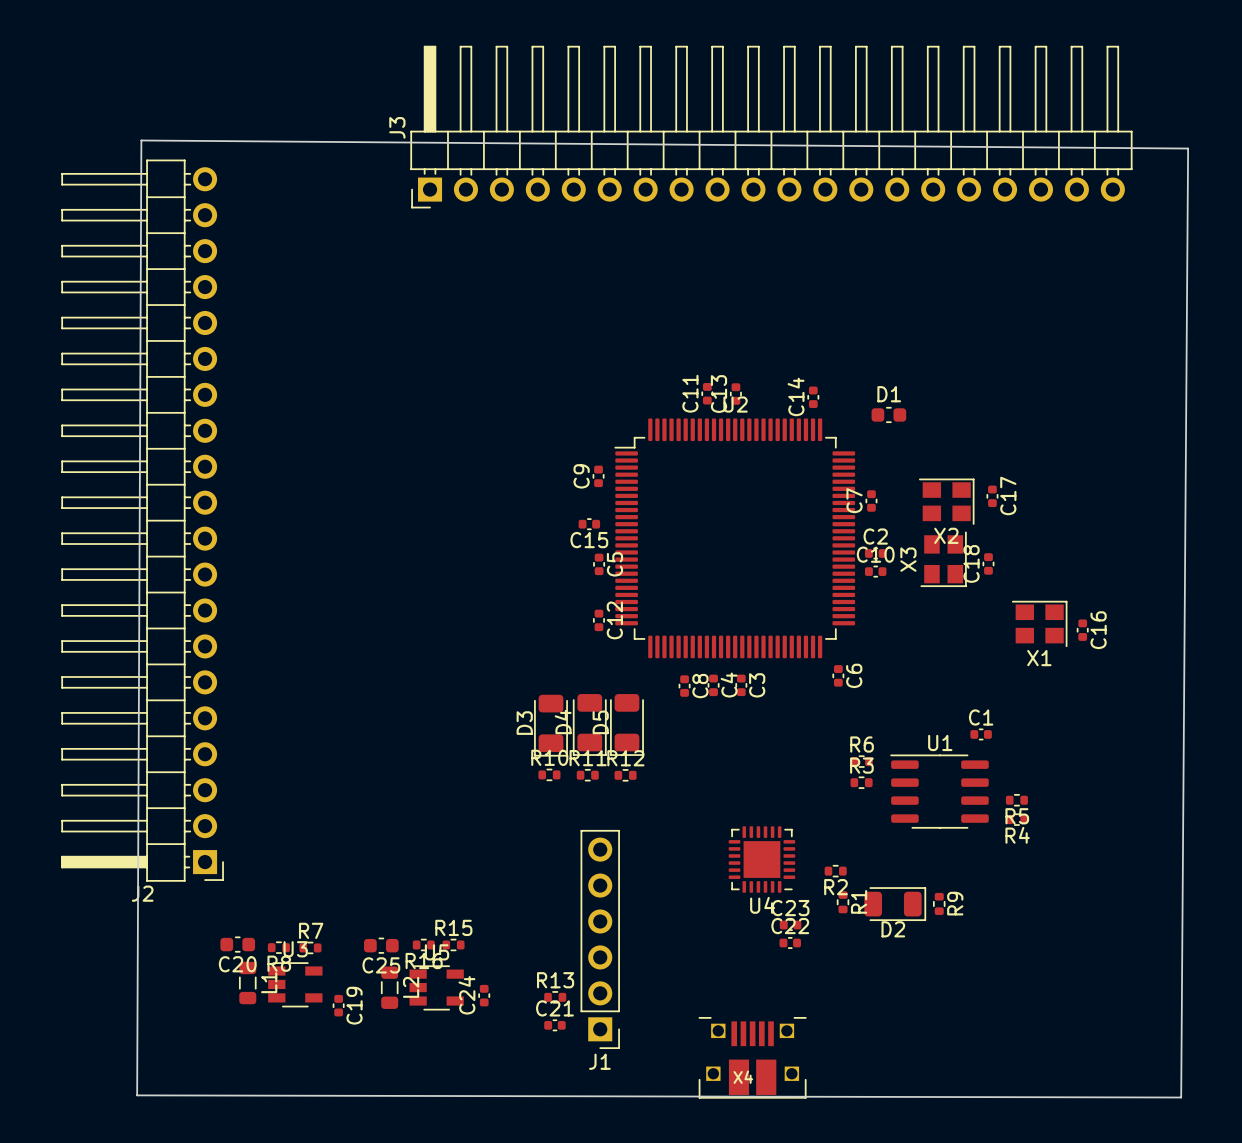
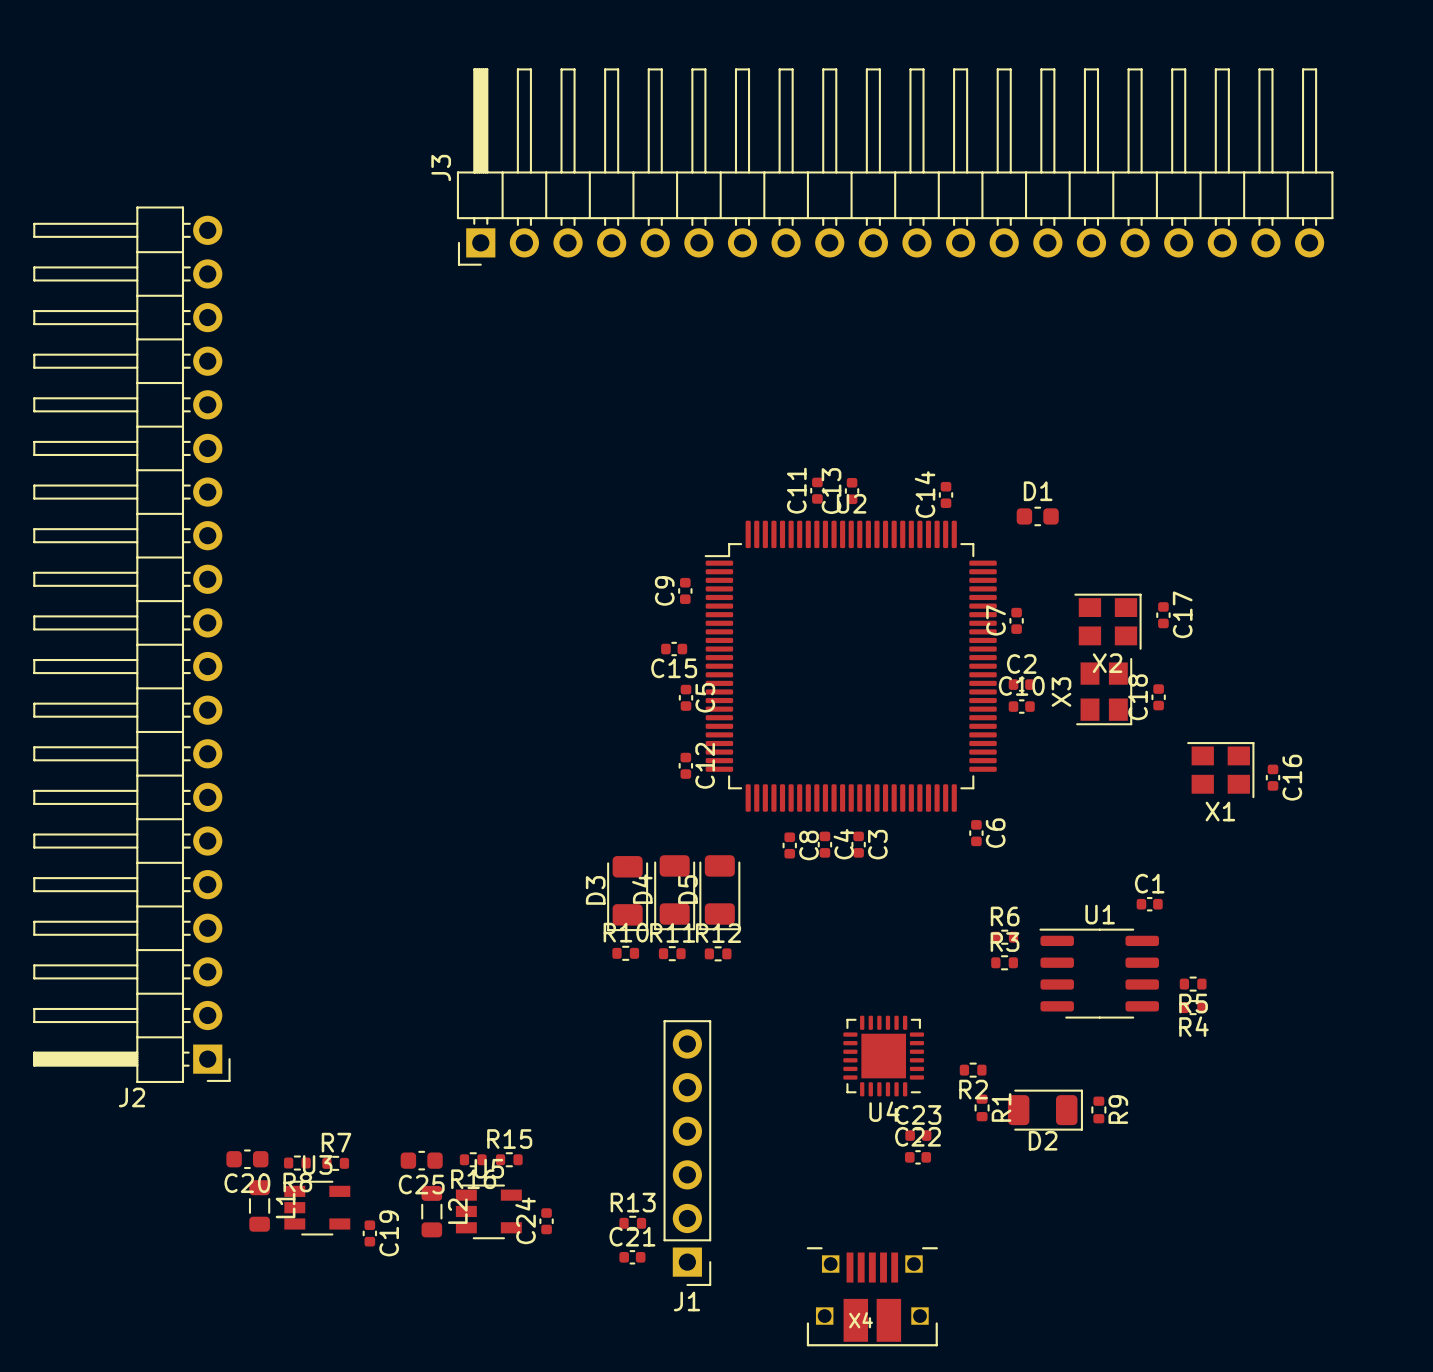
board edge: (141, 140) (1188, 148) (1181, 1097) (137, 1095) (141, 140) -> none

